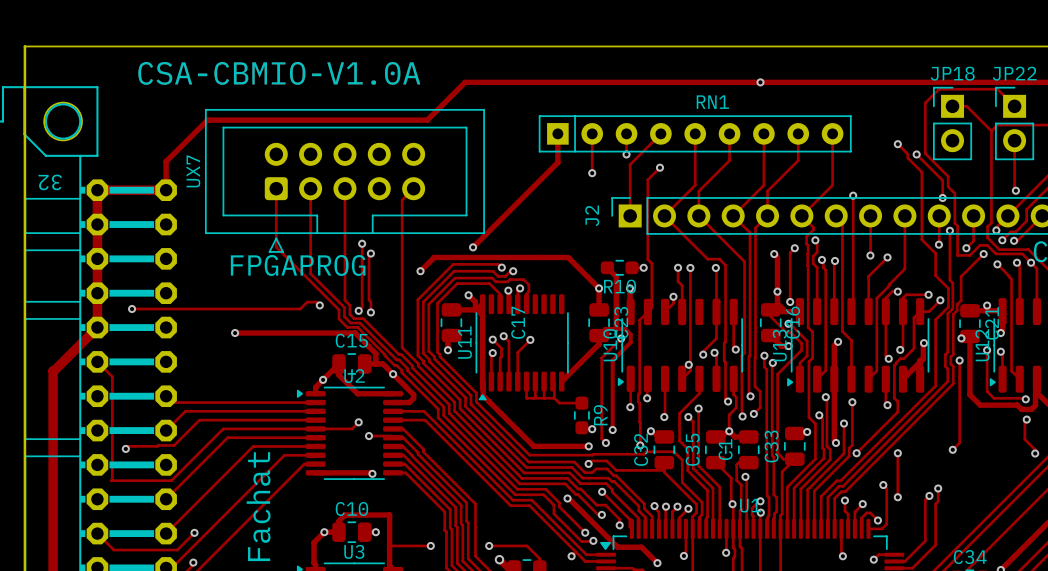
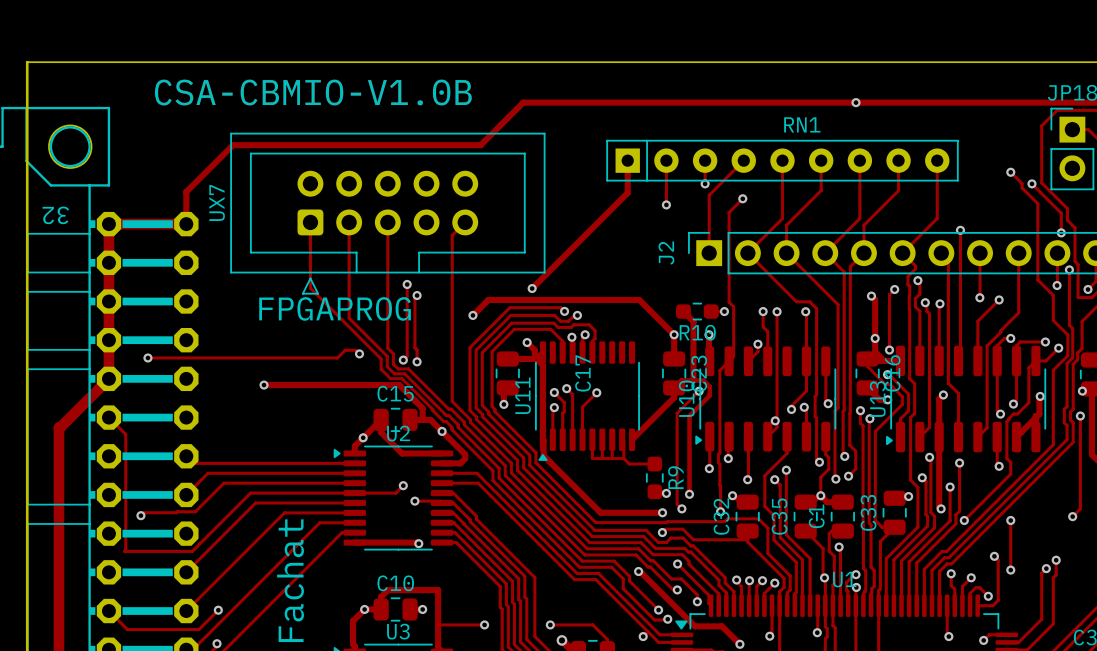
text: none -> CSA-CBMIO-V1.0B (313, 92)
text: CSA-CBMIO-V1.0A (279, 73) -> none

